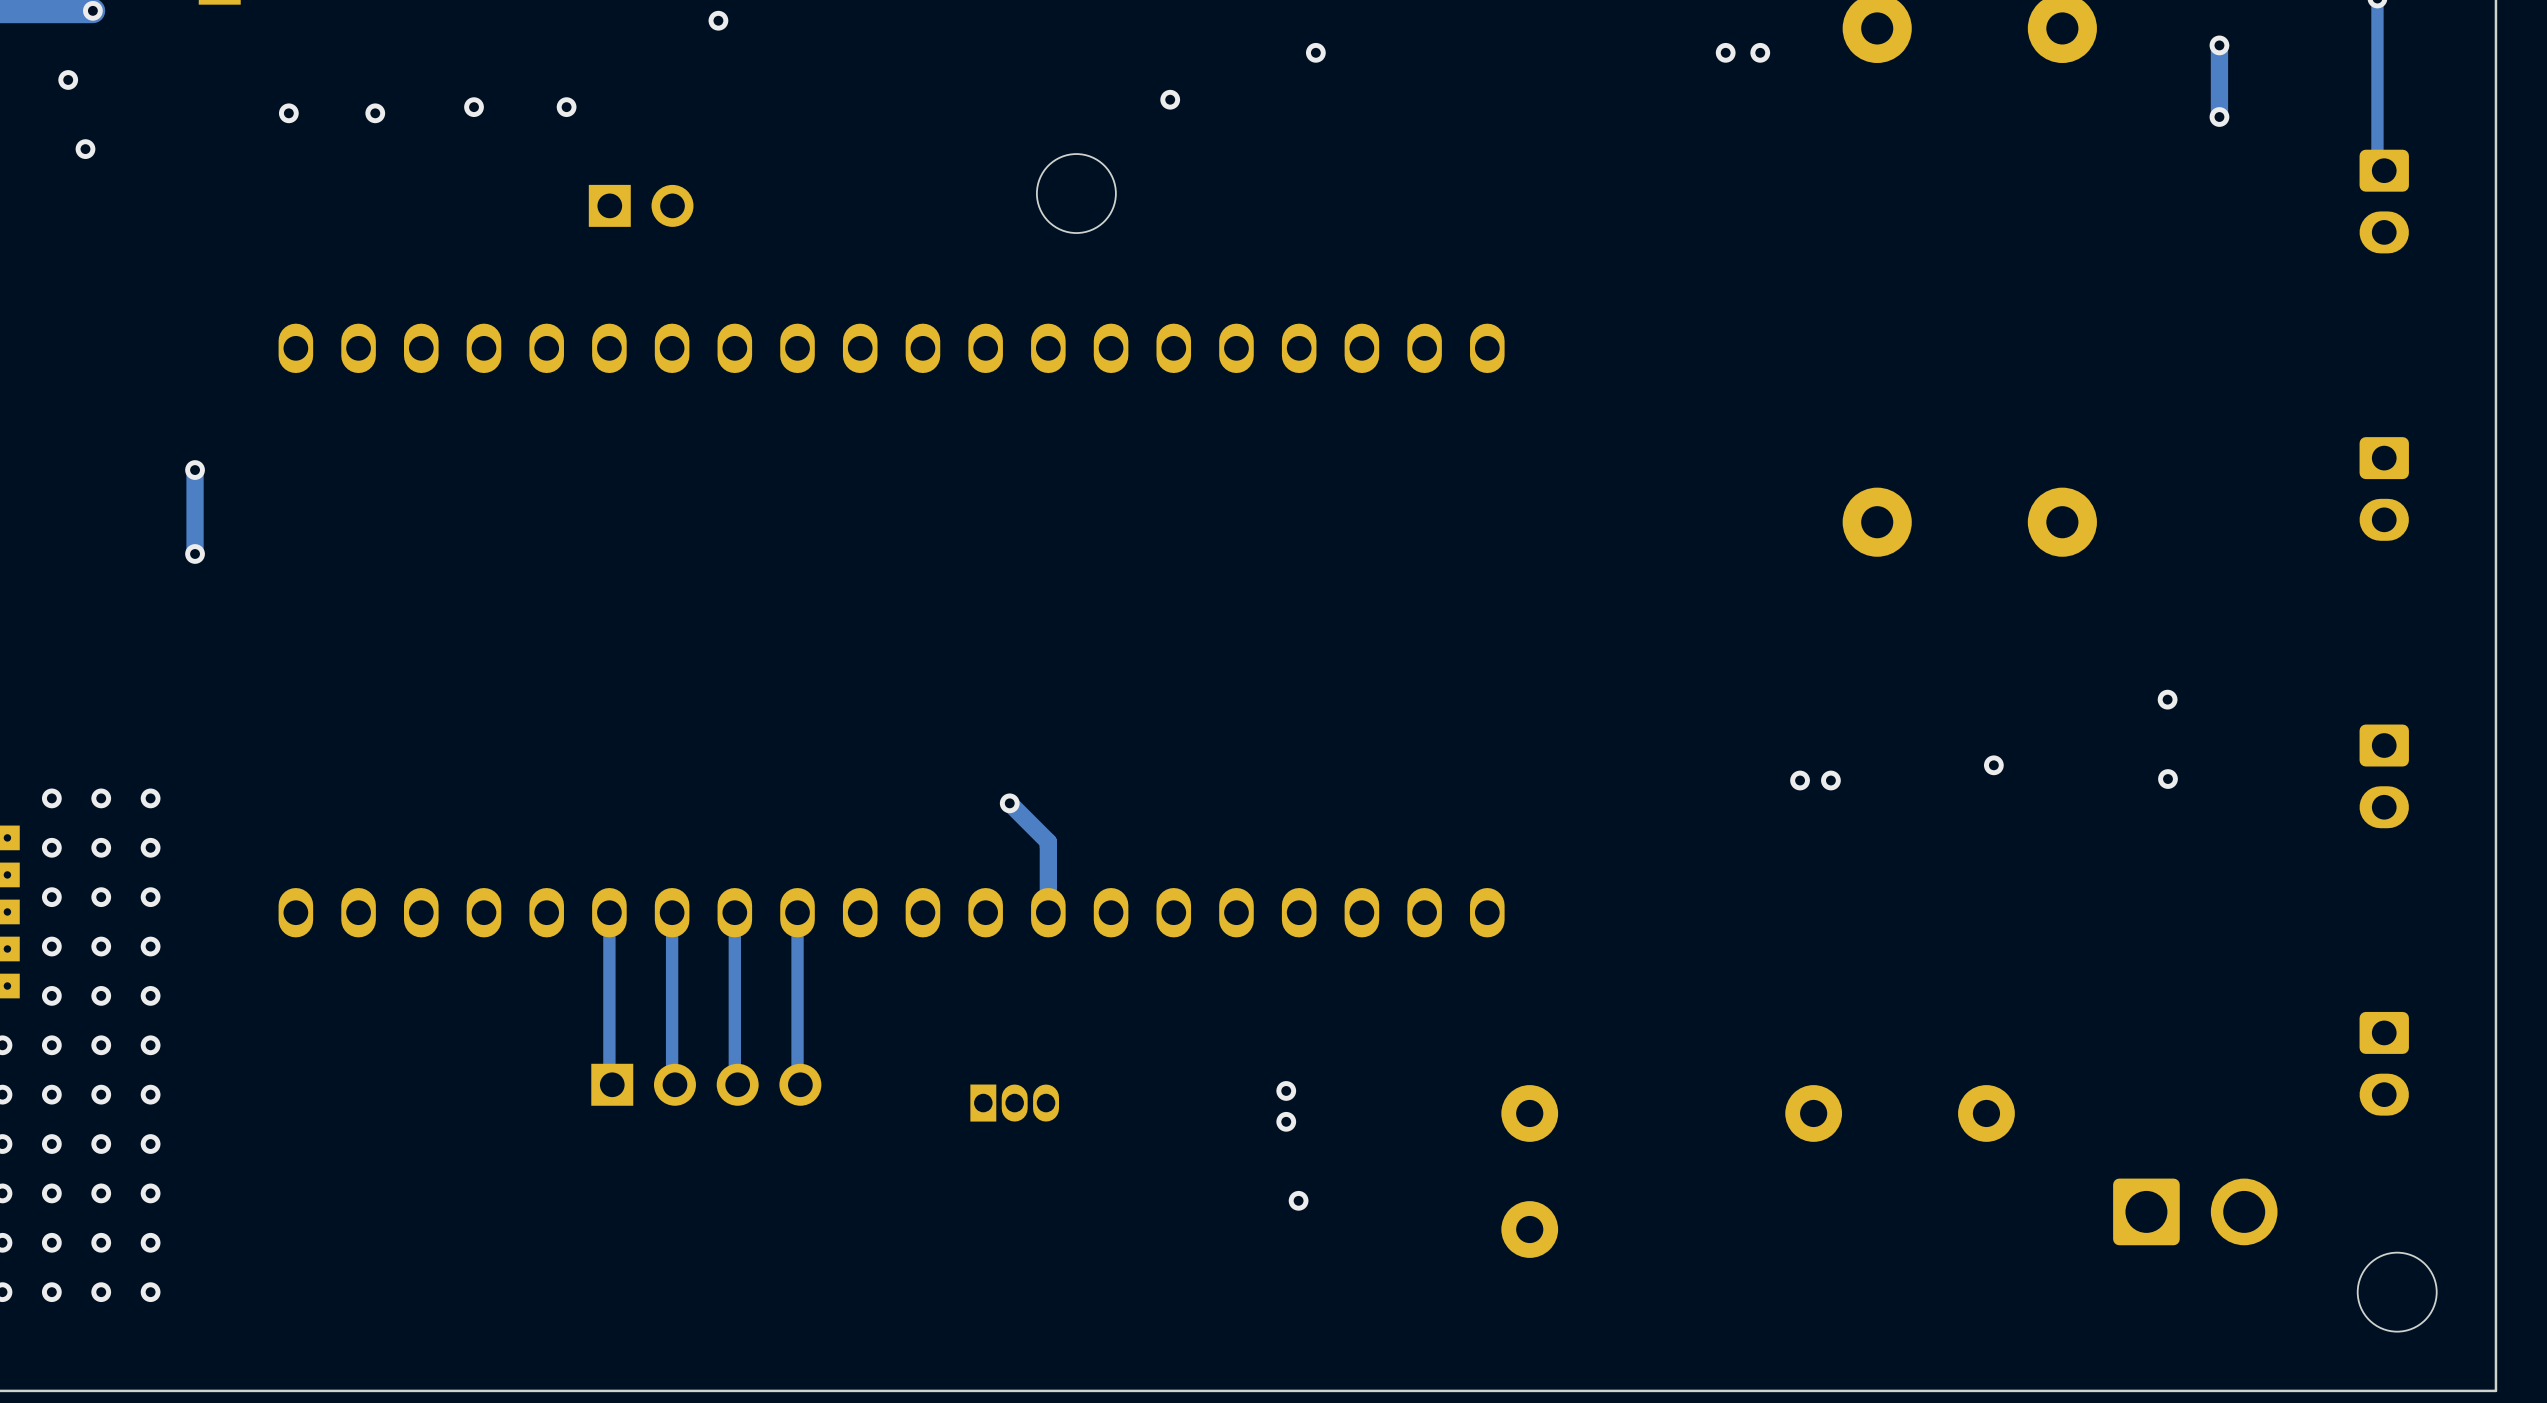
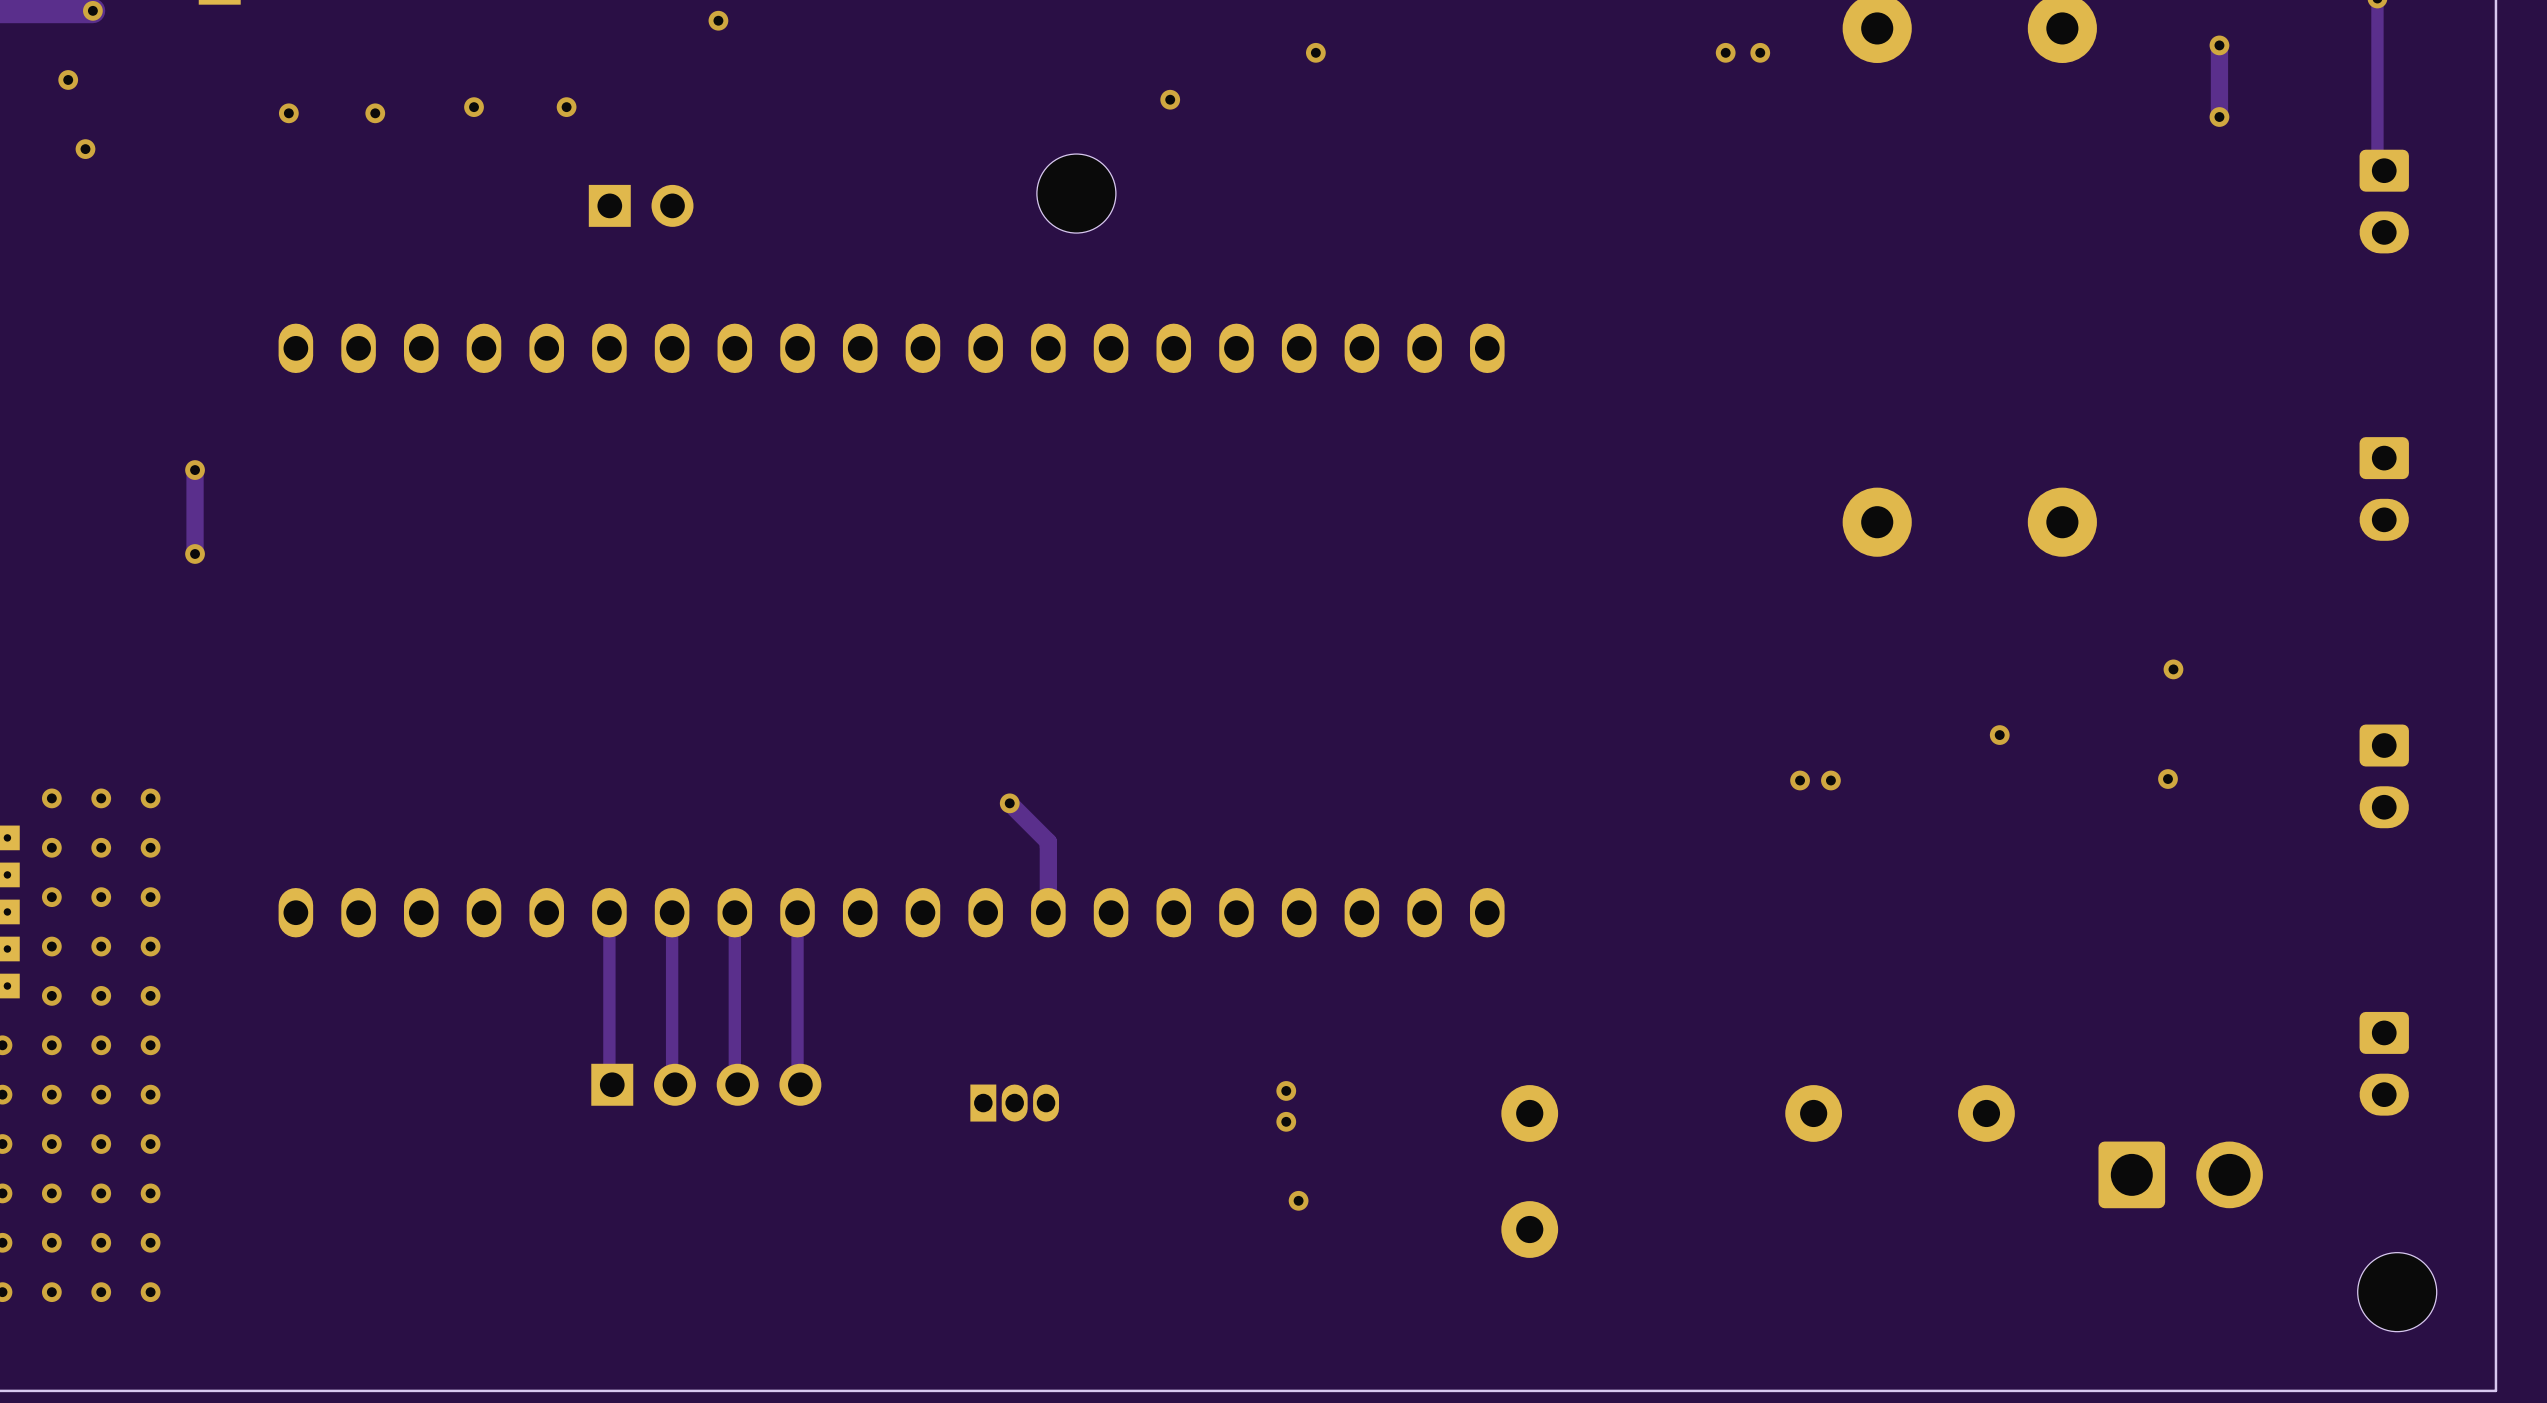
via position: (2167, 699) -> (2173, 669)
via position: (1993, 765) -> (1999, 735)
part position: (2195, 1211) -> (2180, 1174)

